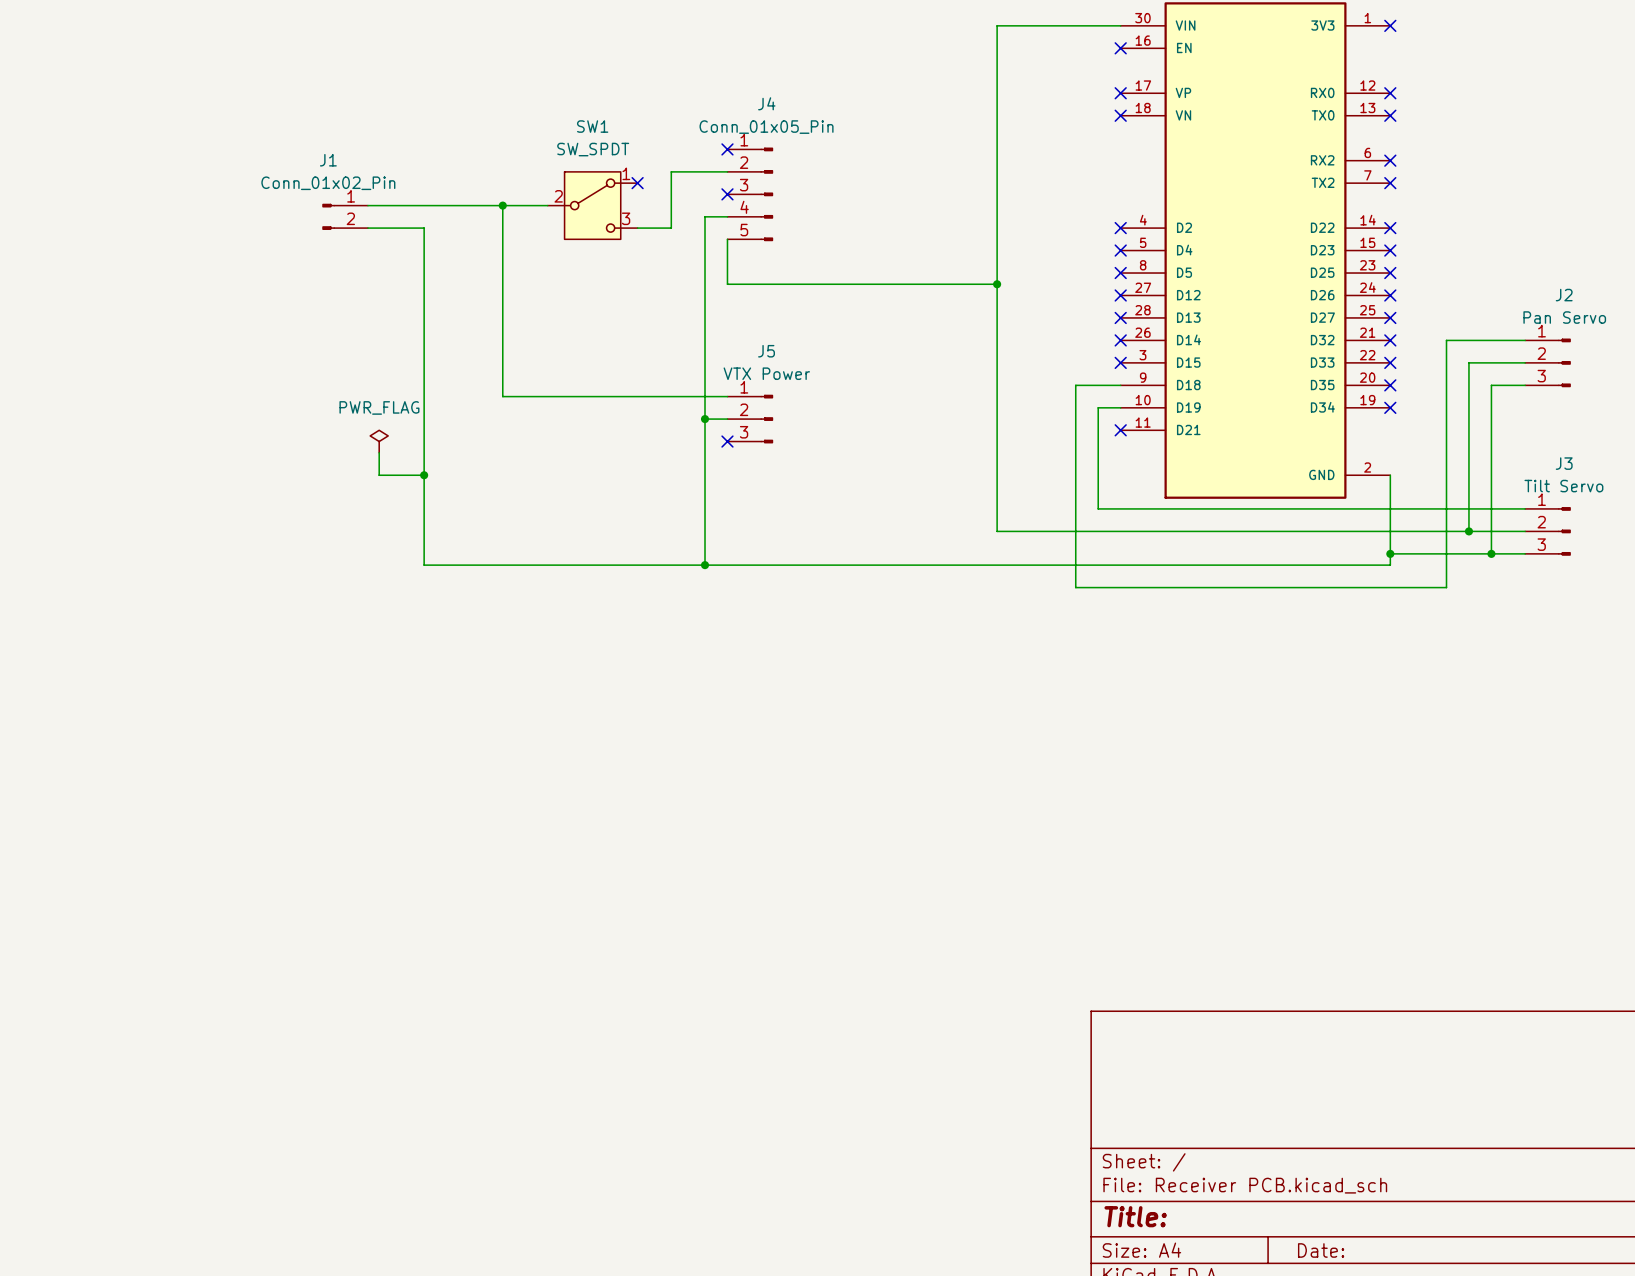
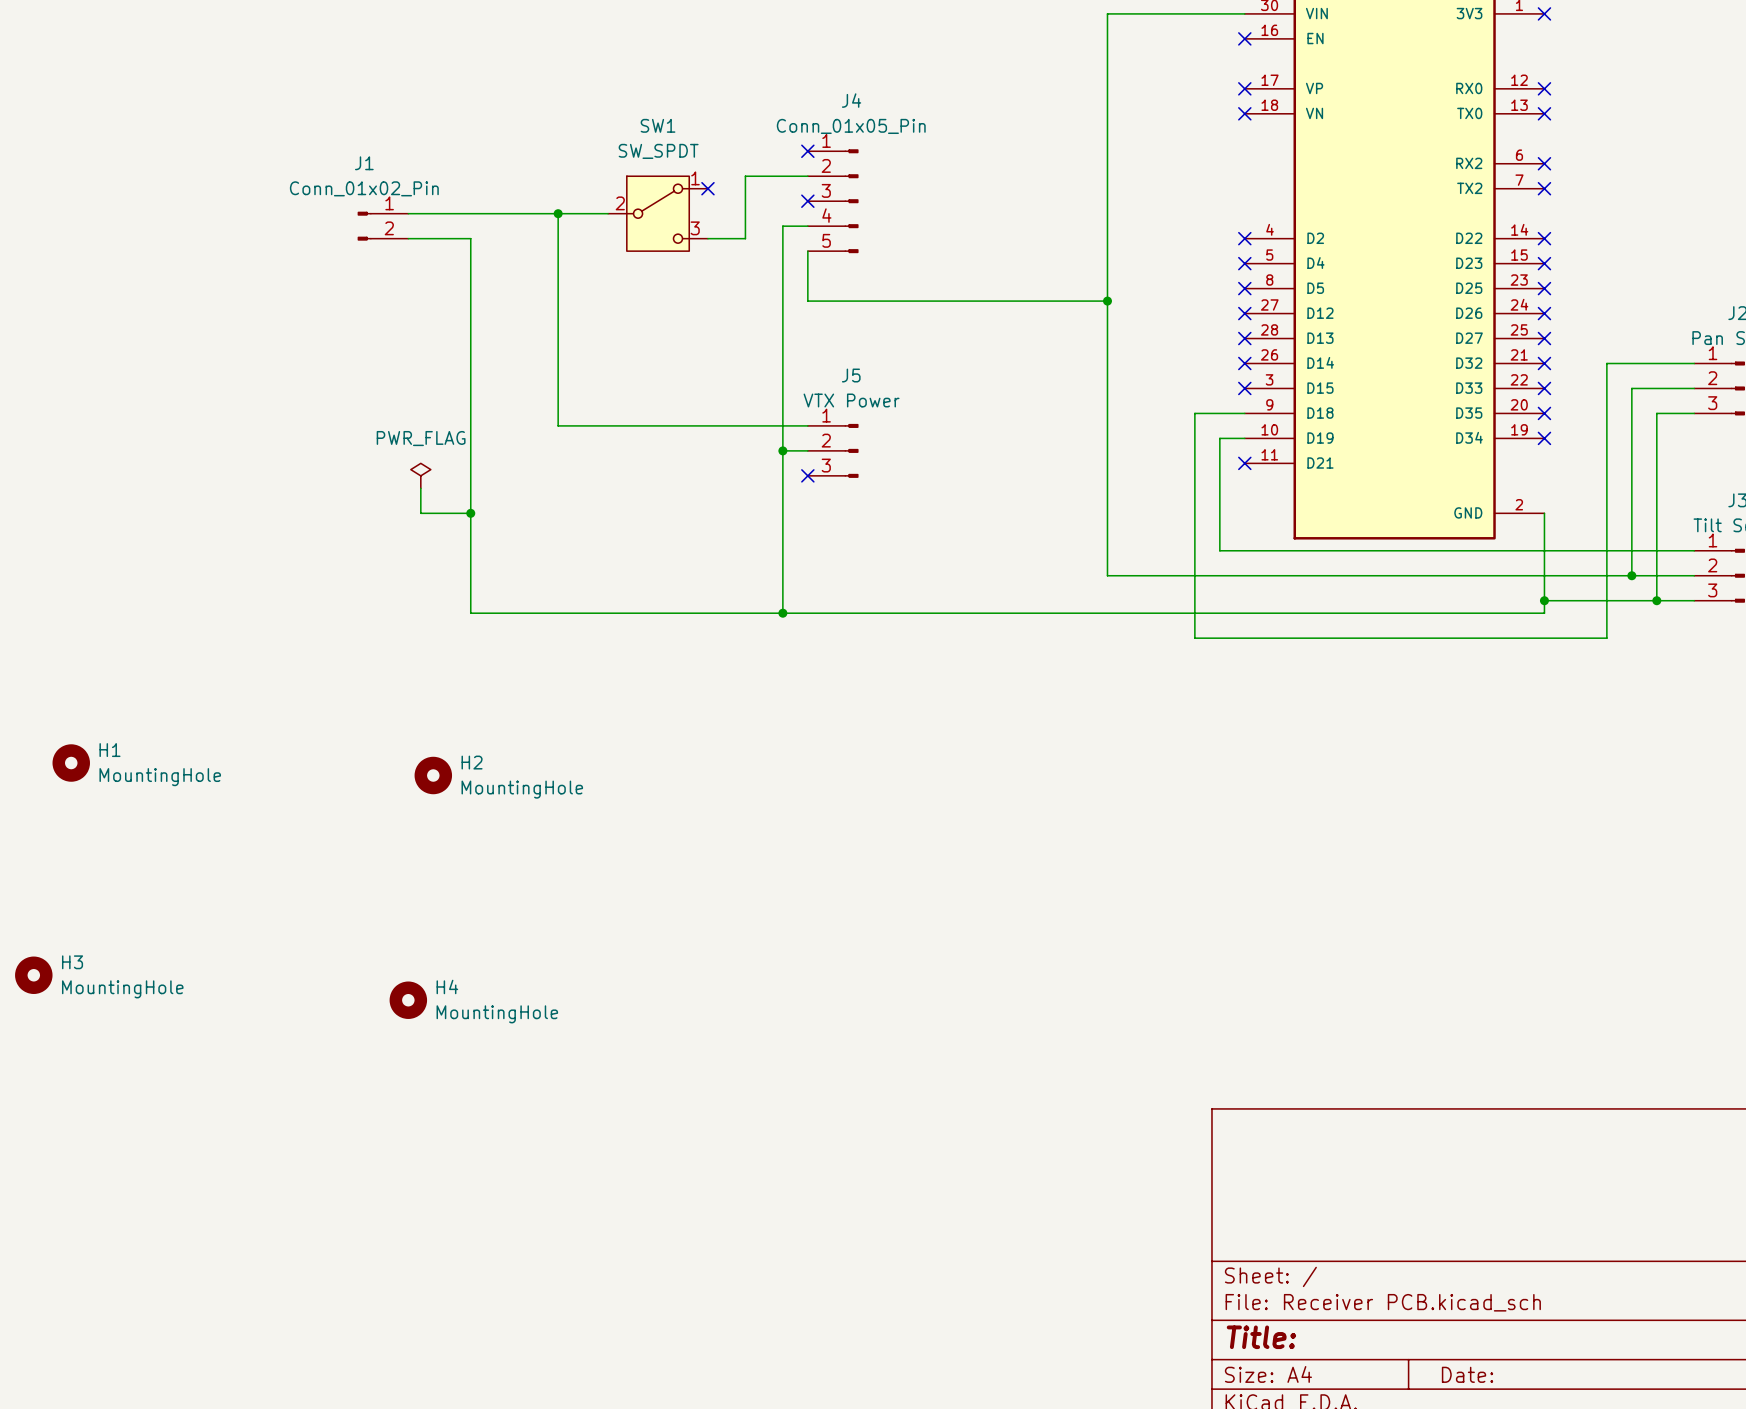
H1: none -> MountingHole (71, 763)
H2: none -> MountingHole (433, 775)
H3: none -> MountingHole (33, 975)
H4: none -> MountingHole (408, 1000)

